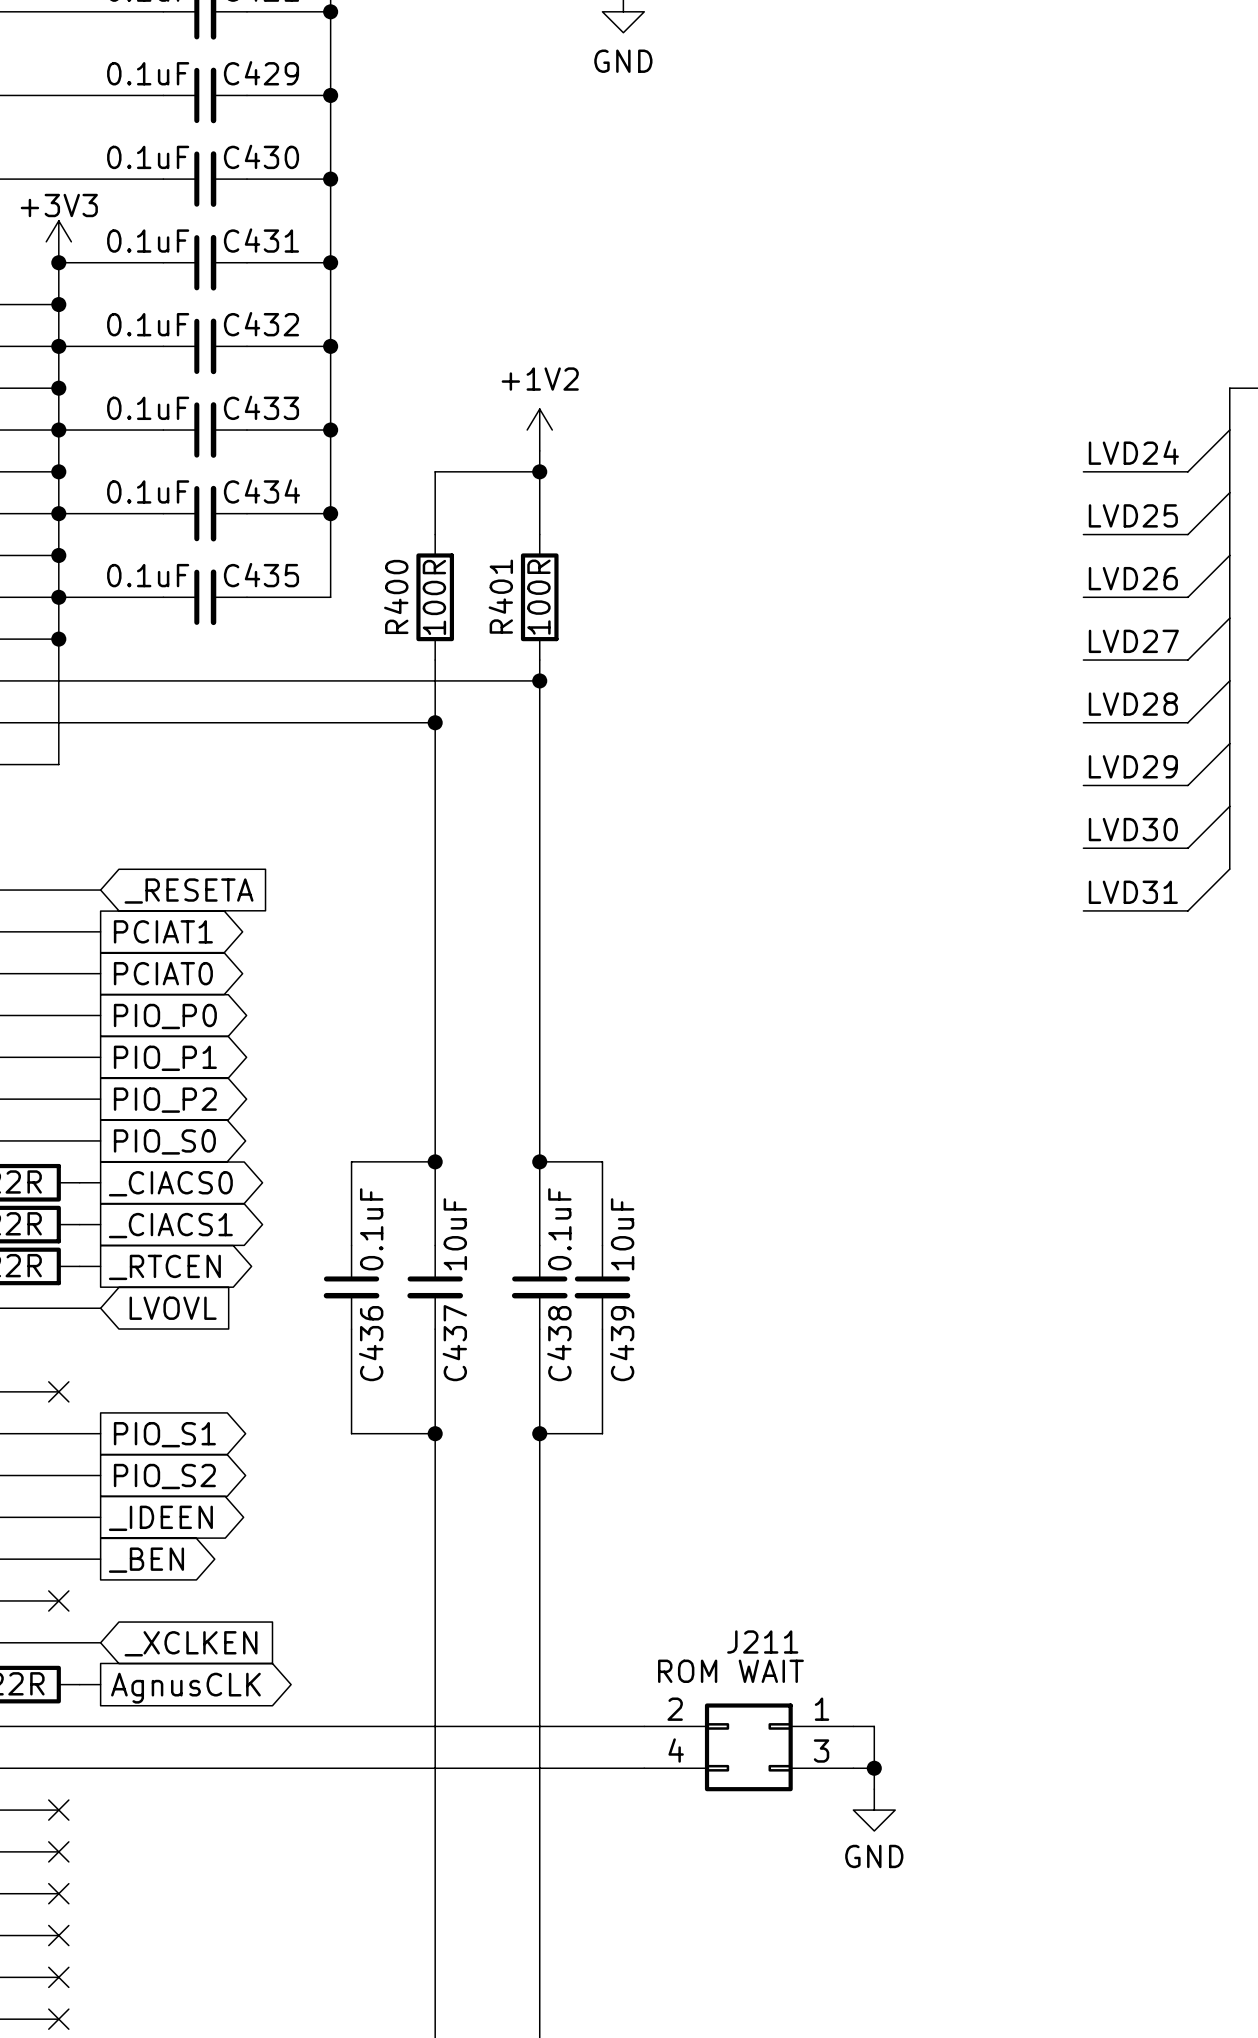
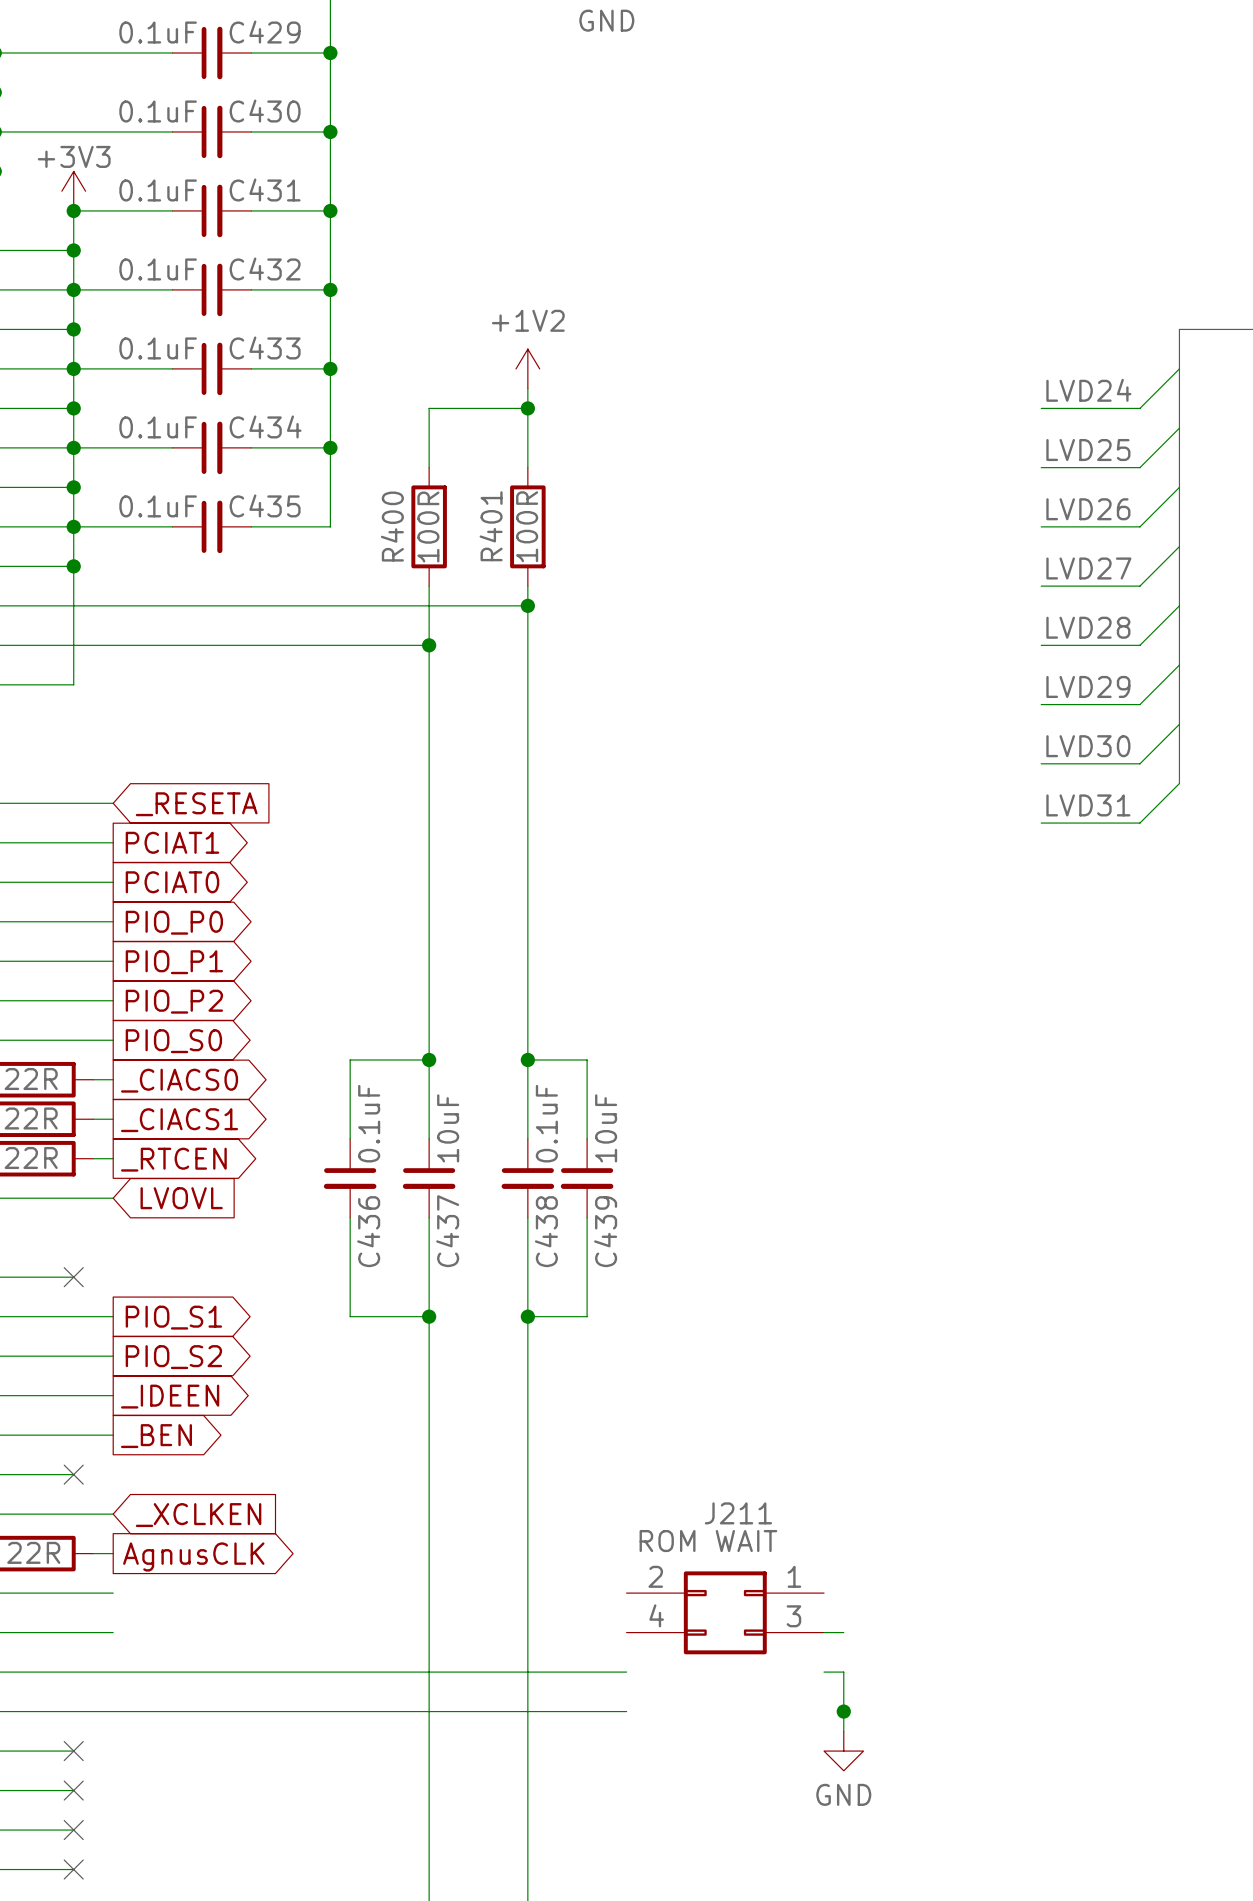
wire: (100, 1726) (644, 1726) -> none
wire: (853, 1726) (874, 1726) (874, 1789) -> (824, 1672) (843, 1672) (843, 1731)
wire: (100, 1768) (644, 1768) -> none
junction position: (874, 1768) -> (843, 1711)
wire: none -> (73, 1672) (626, 1672)
no-connect mark: (58, 1810) -> none
power symbol position: GND (874, 1810) -> GND (843, 1751)
wire: none -> (73, 1711) (626, 1711)
no-connect mark: (58, 1851) -> none

